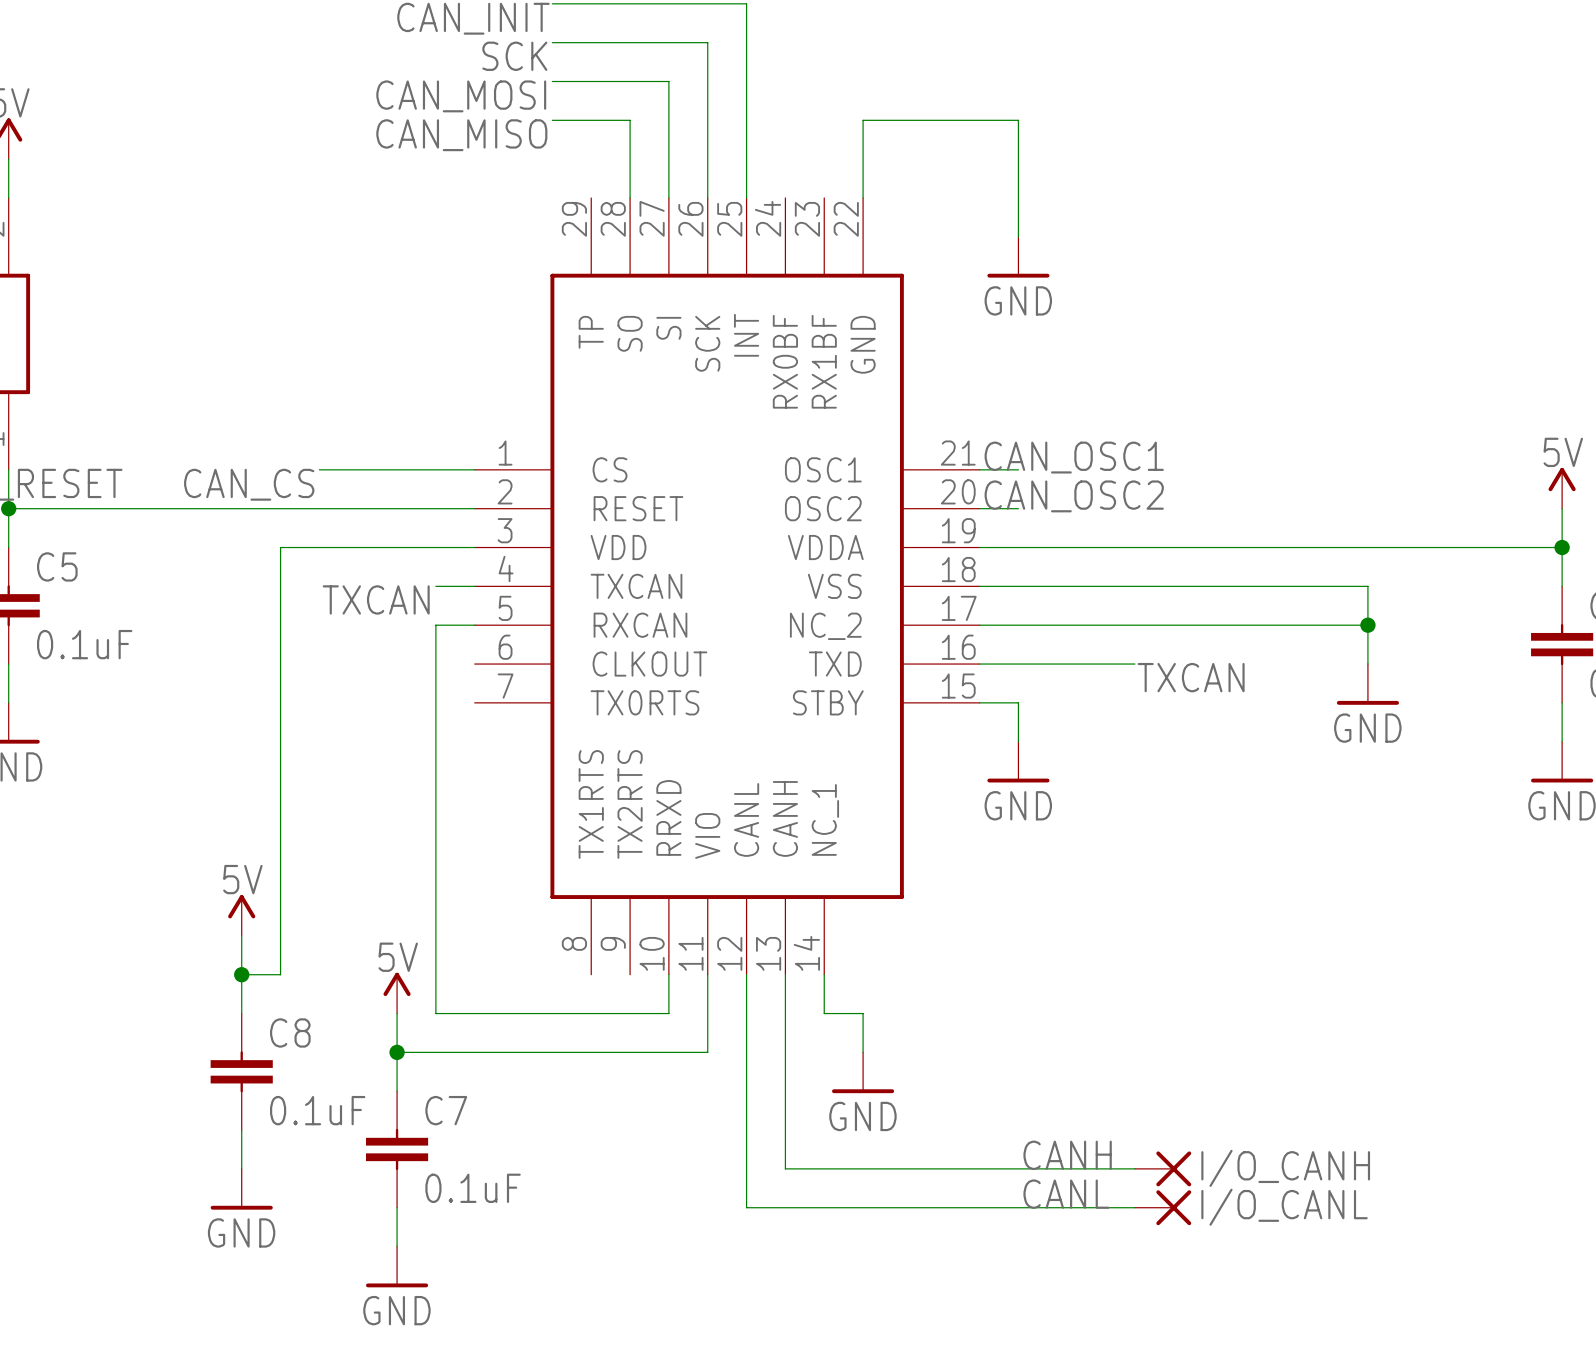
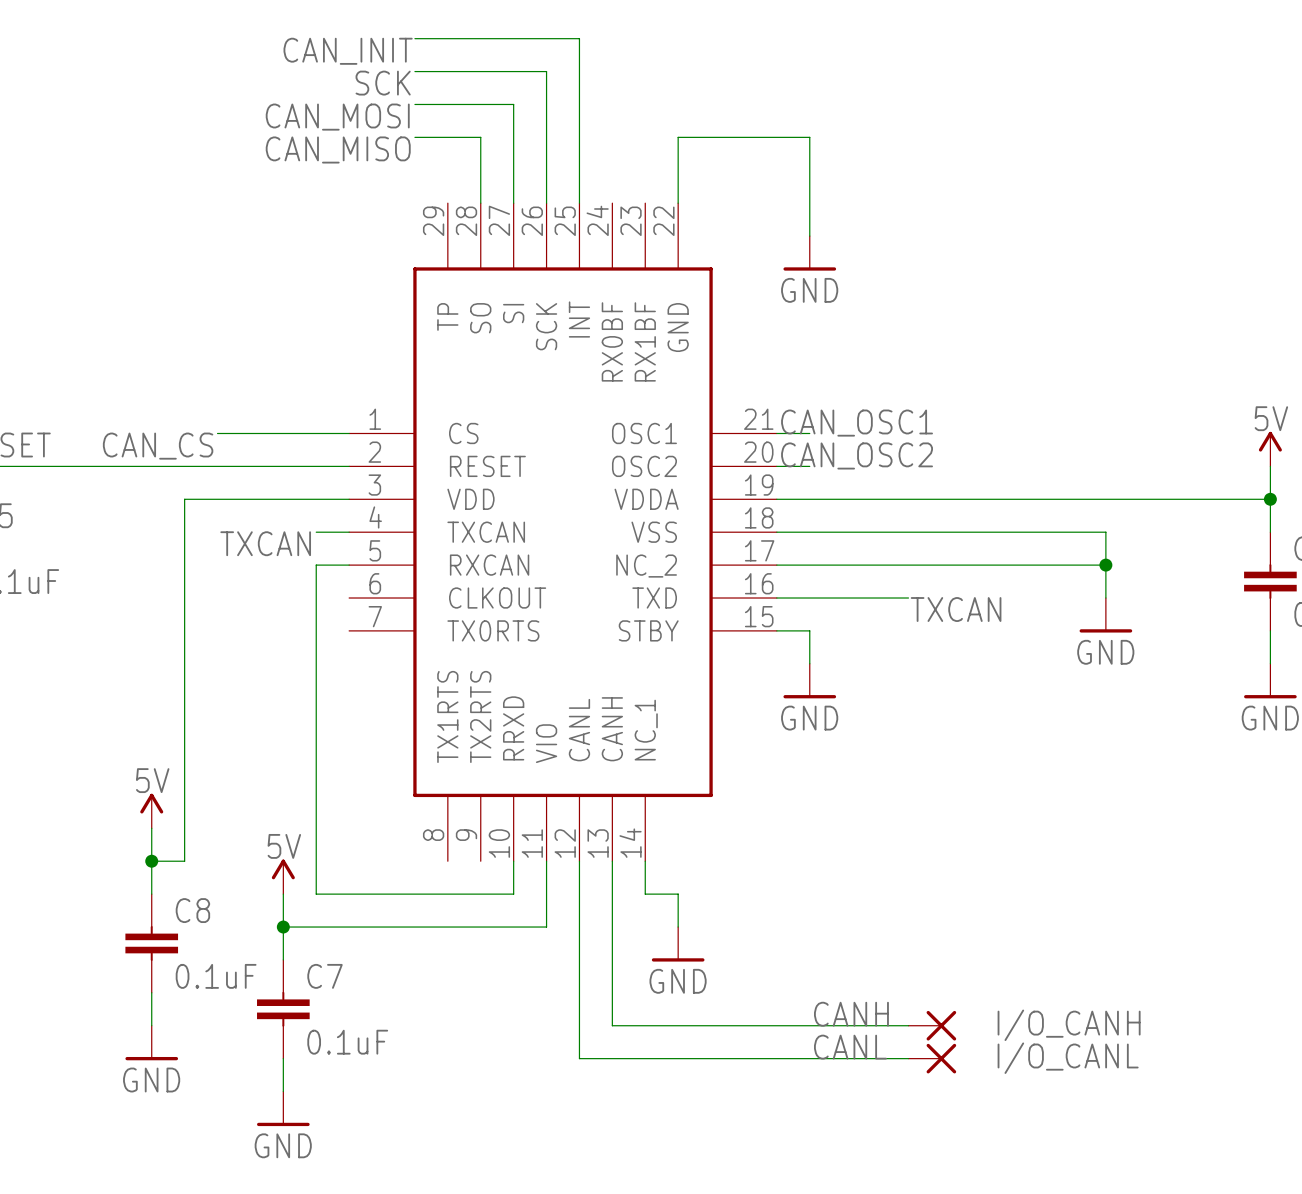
I/O_CANH name position: I/O_CANH (1285, 1168) -> I/O_CANH (1069, 1025)
I/O_CANL name position: I/O_CANL (1284, 1207) -> I/O_CANL (1068, 1058)

